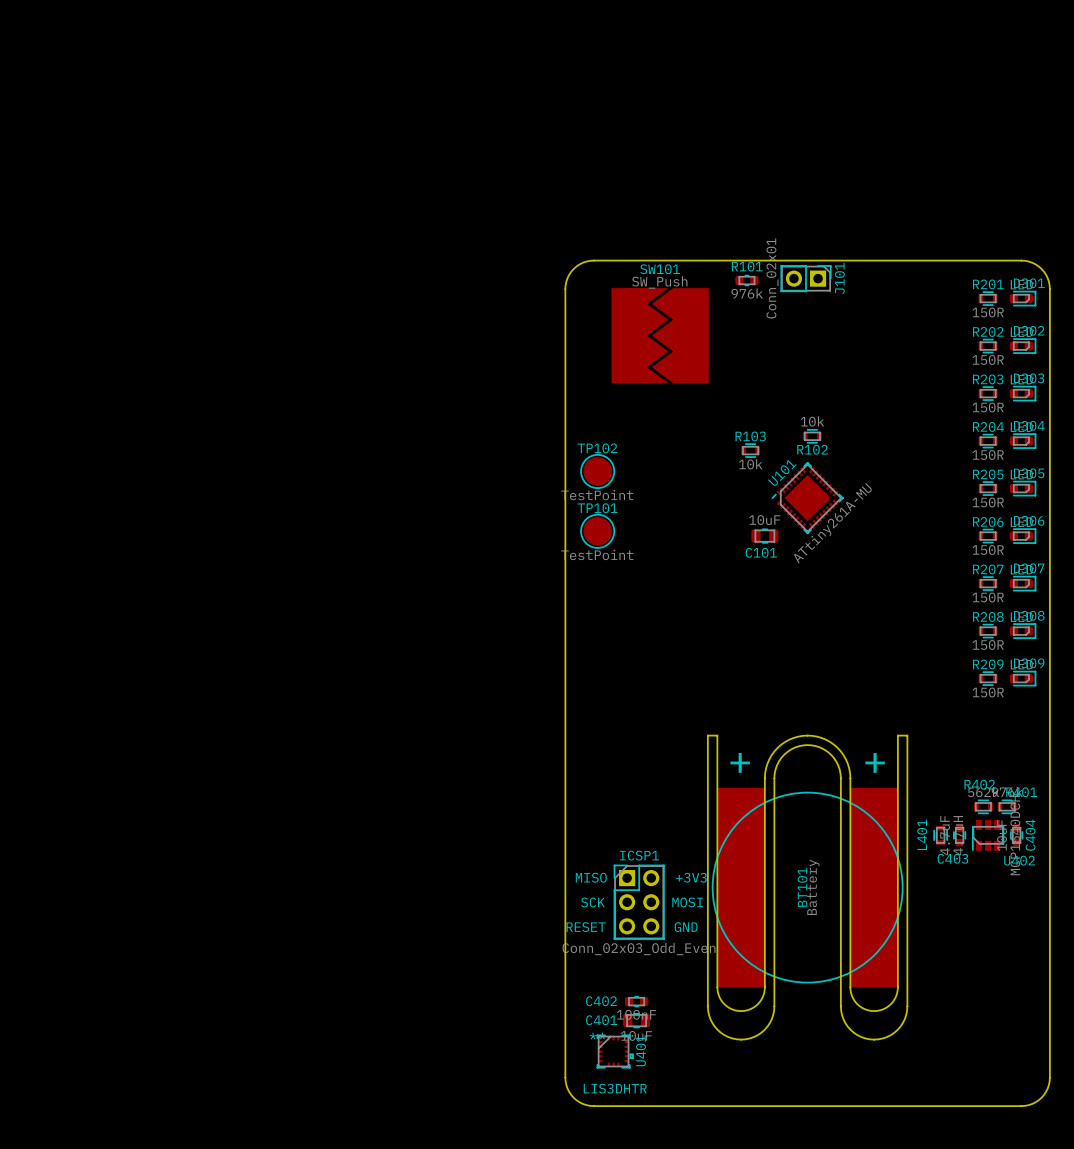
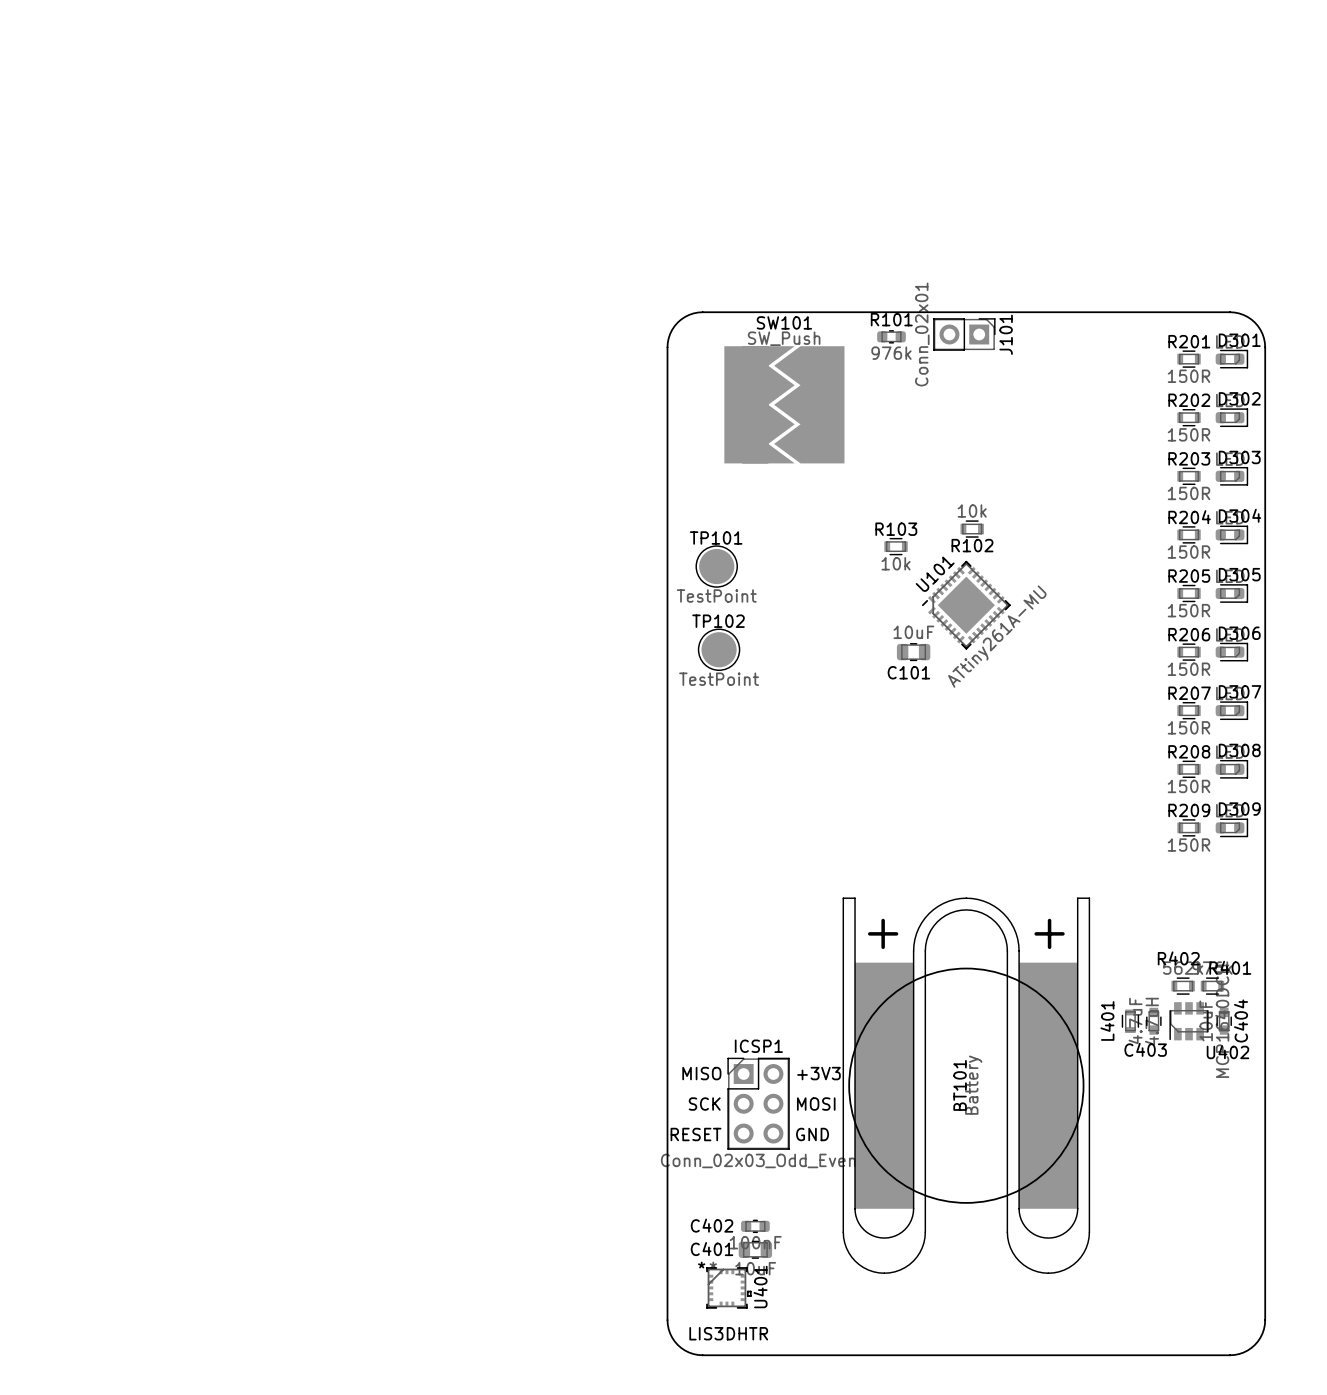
TP102 position: (597, 471) -> (719, 649)
TP101 position: (597, 531) -> (716, 566)

